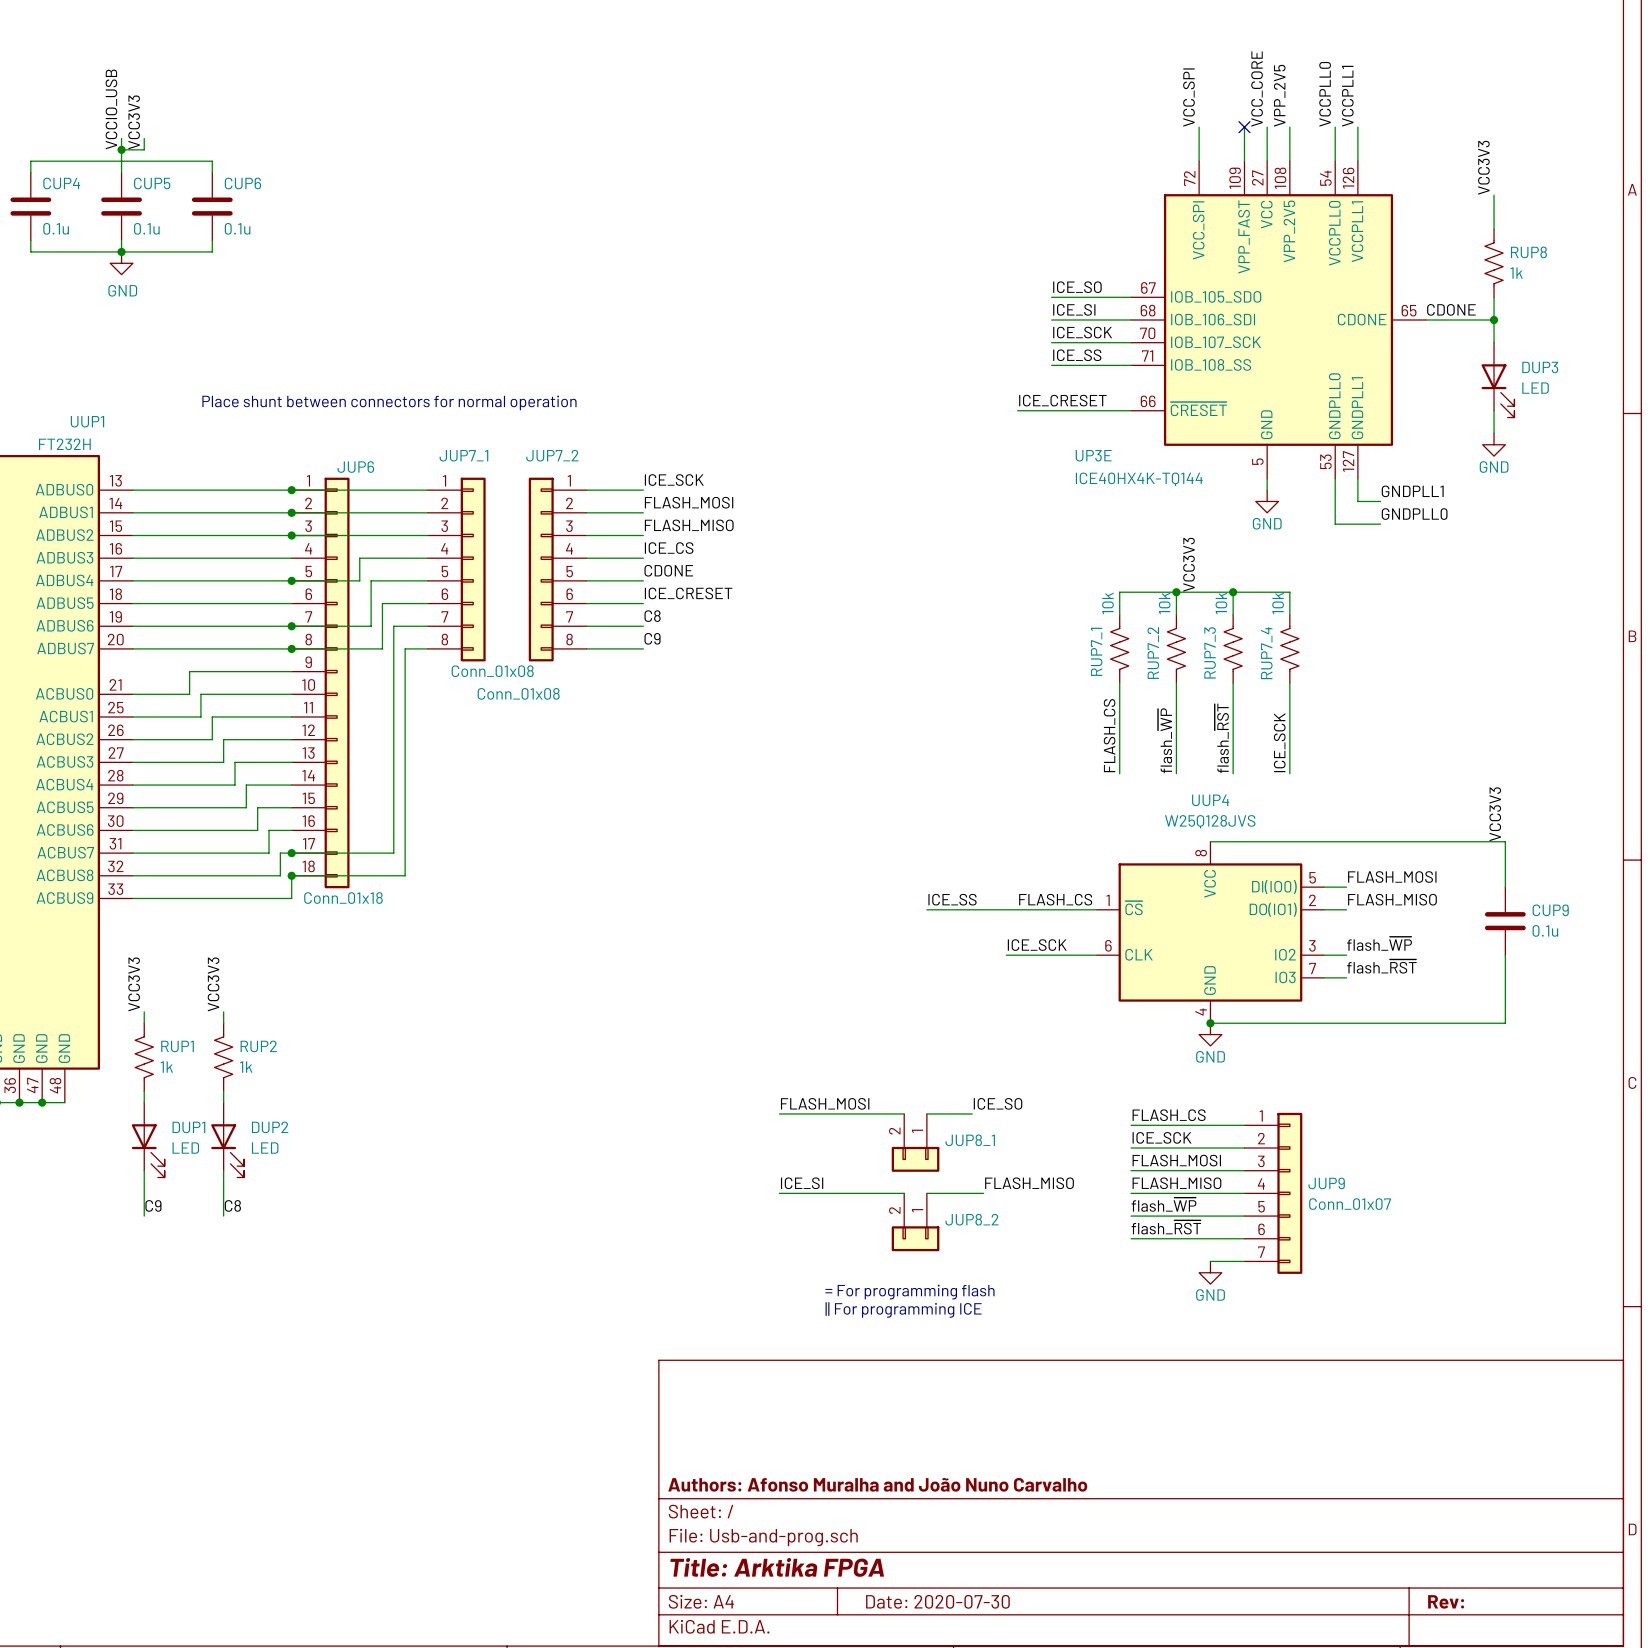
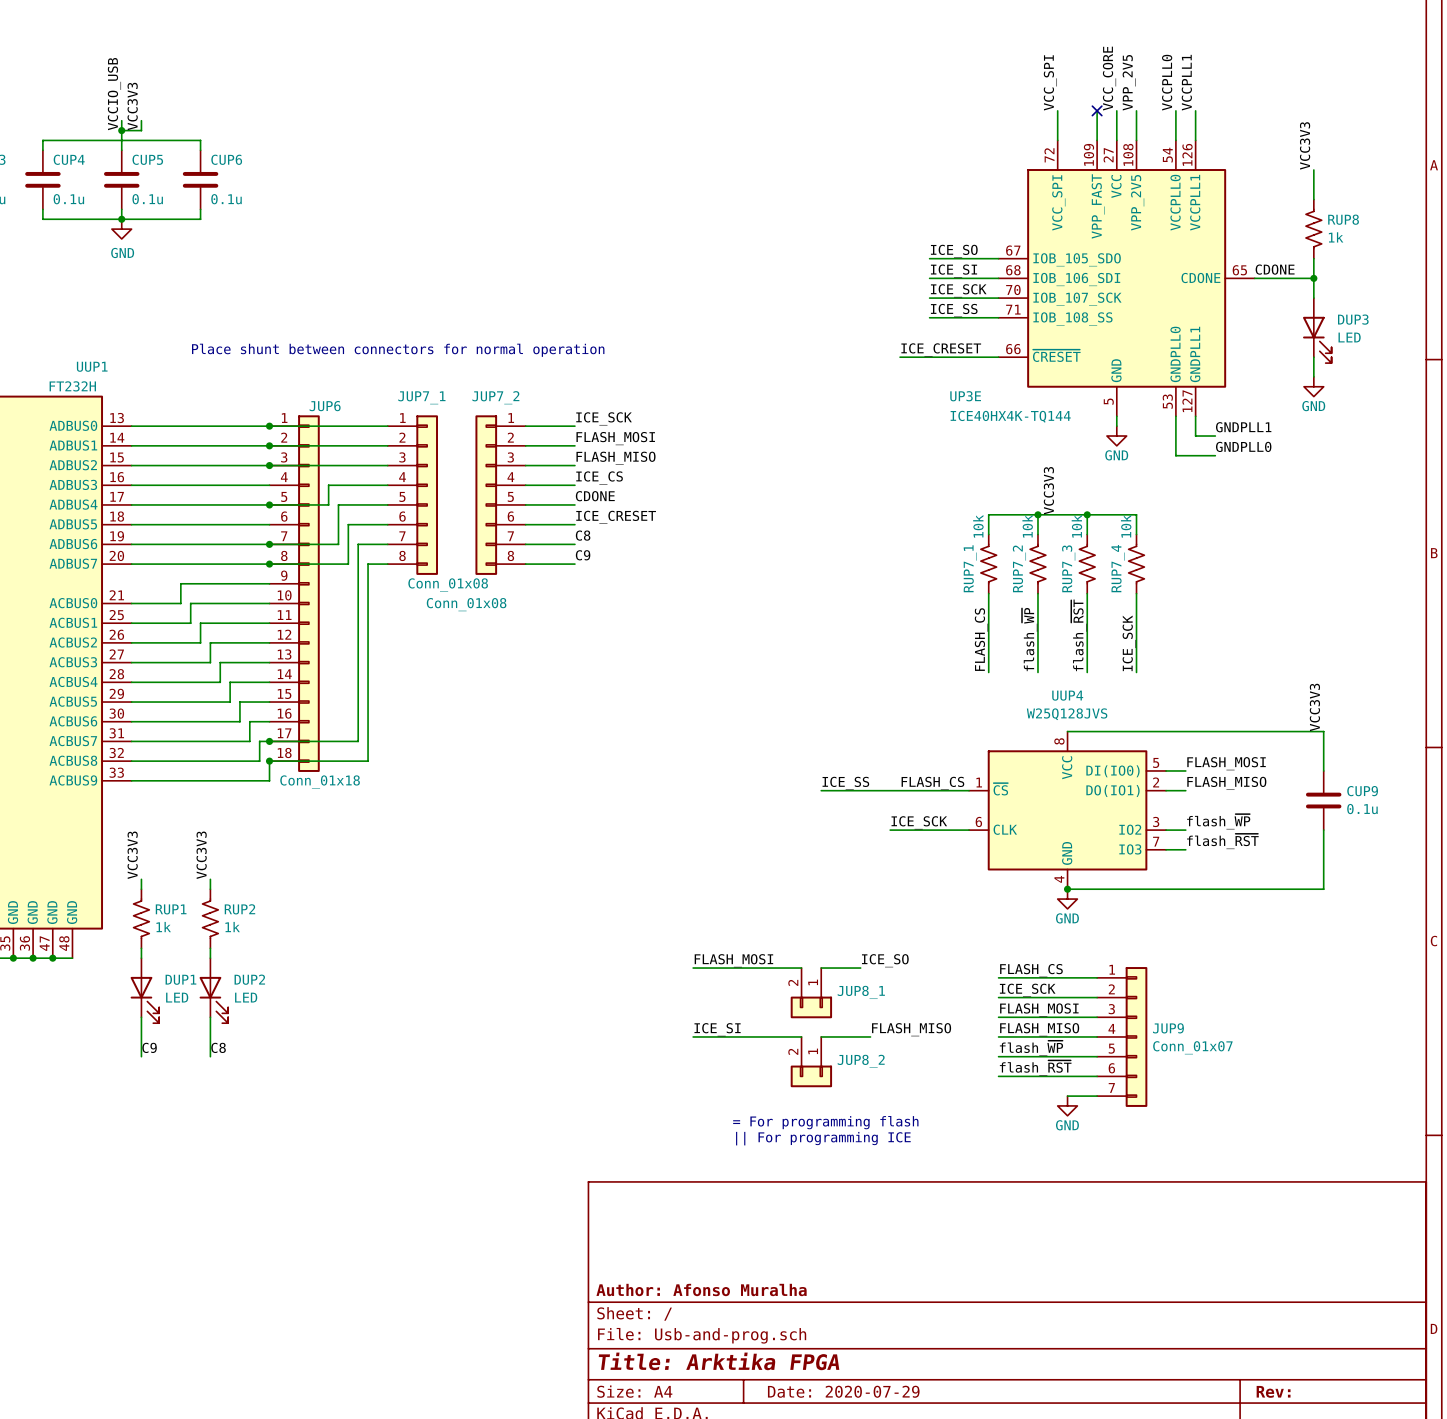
title block: Authors: Afonso Muralha and João Nuno Carvalho (877, 1484) -> Author: Afonso Muralha (701, 1289)
title block: Date: 2020-07-30 (937, 1601) -> Date: 2020-07-29 (843, 1391)

